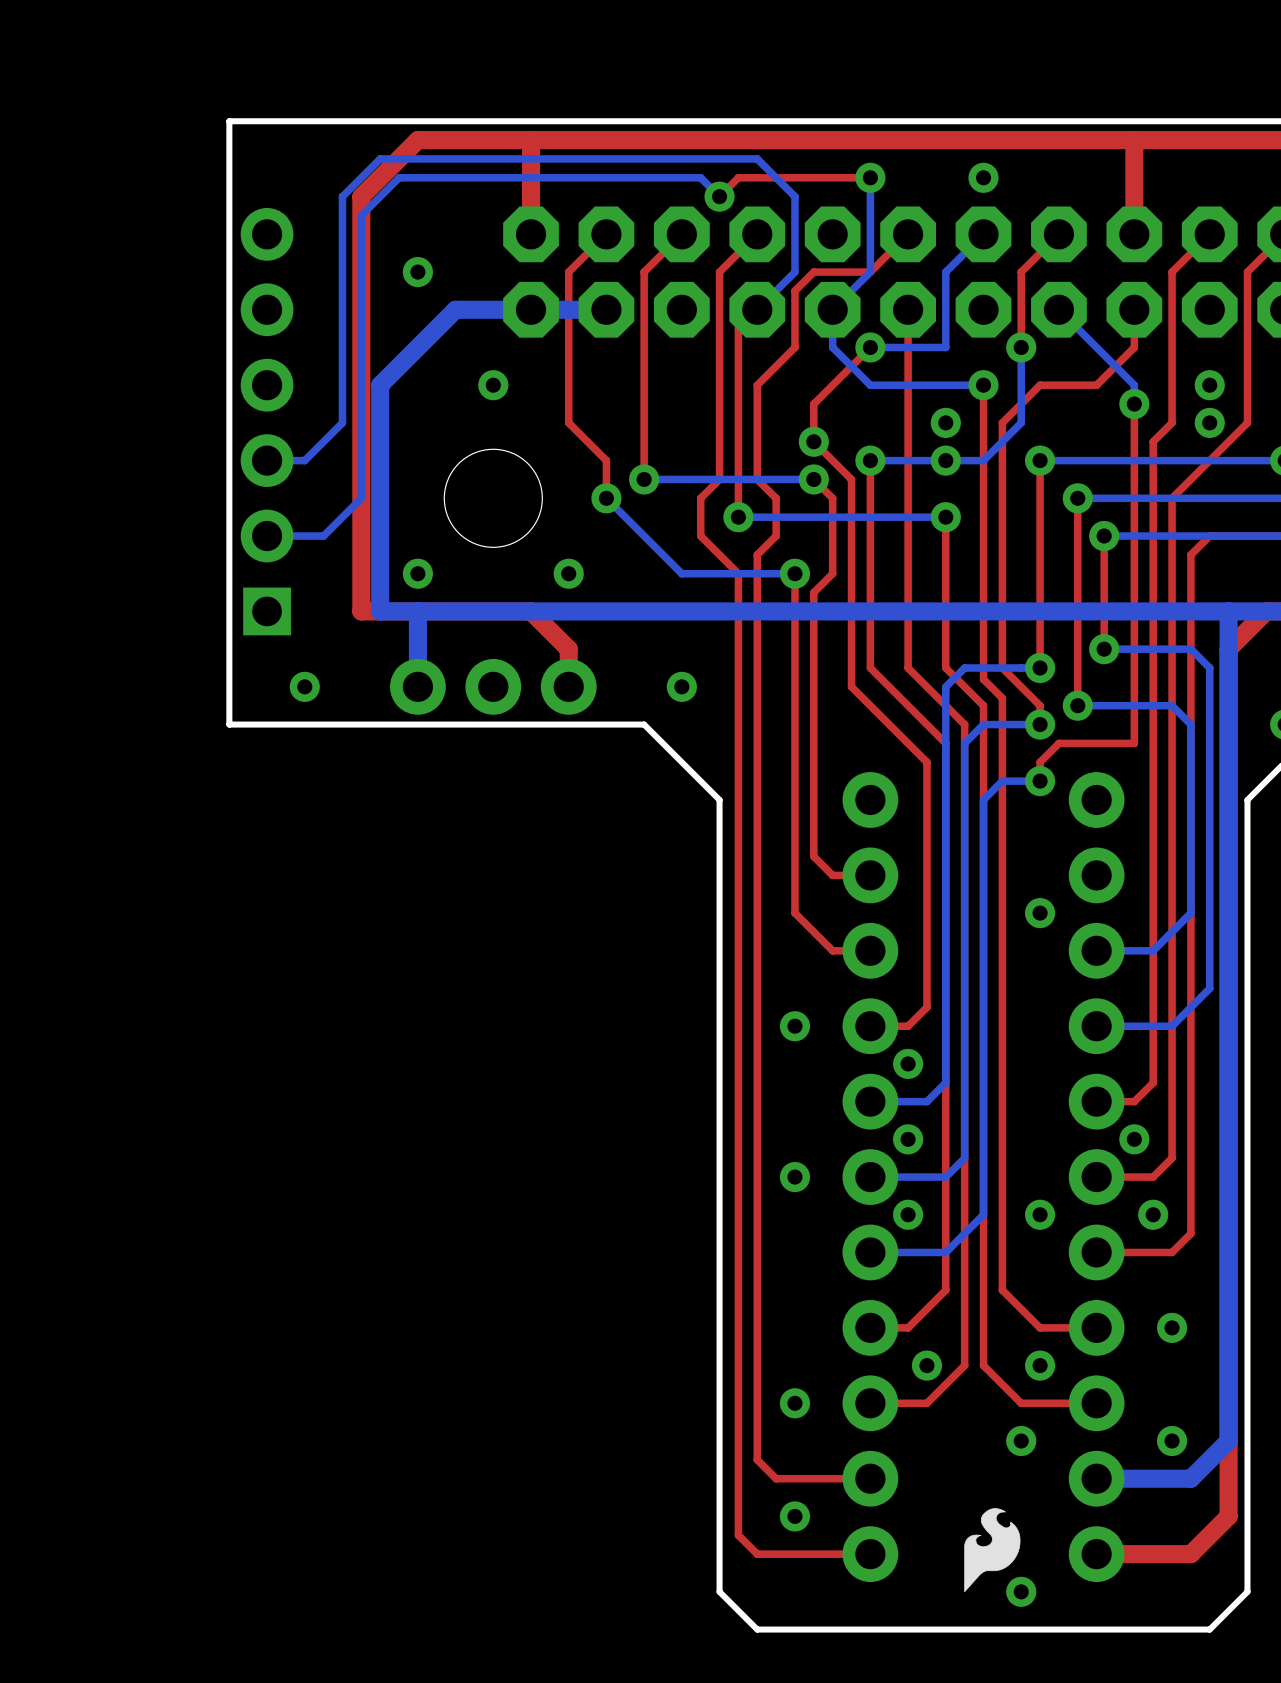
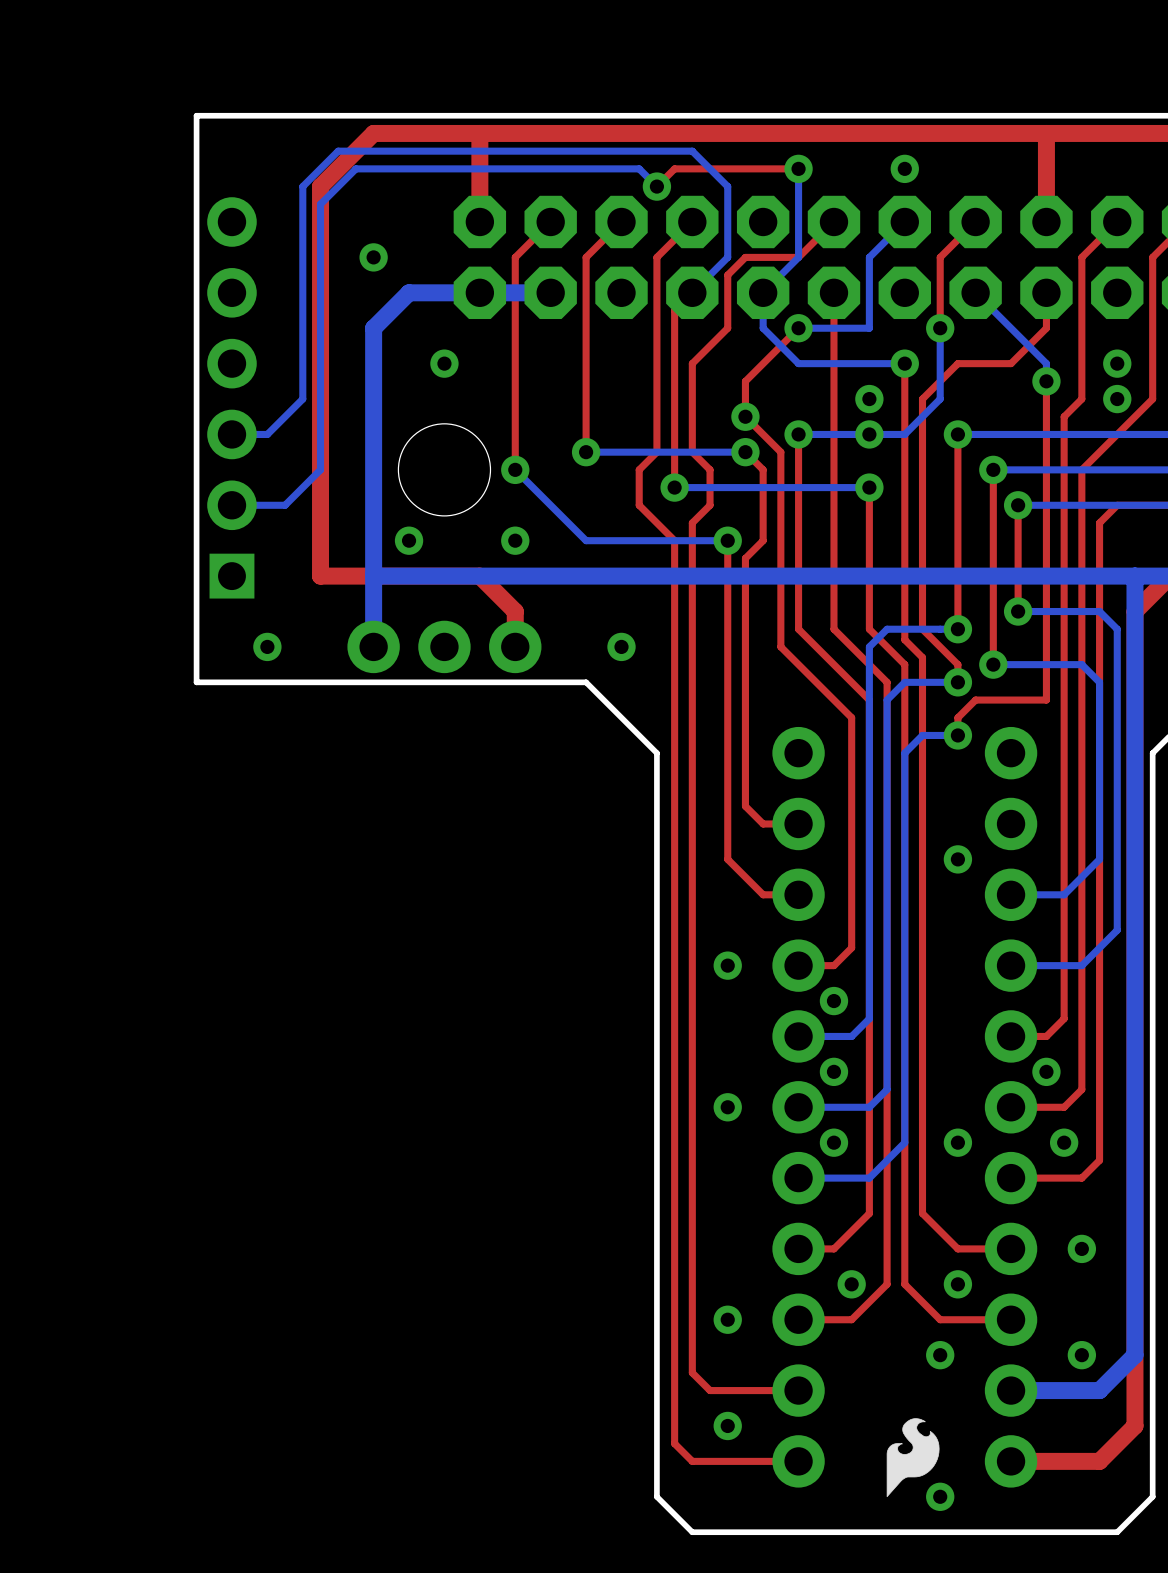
bottom track: (417, 347) (380, 385) (380, 611) (417, 611) -> (373, 328) (373, 576)
top track: (568, 422) (606, 460) (606, 498) -> (515, 399) (515, 469)
bottom track: (606, 498) (681, 573) -> (515, 469) (586, 540) (621, 540)
via position: (606, 498) -> (515, 469)
via position: (417, 573) -> (409, 540)

